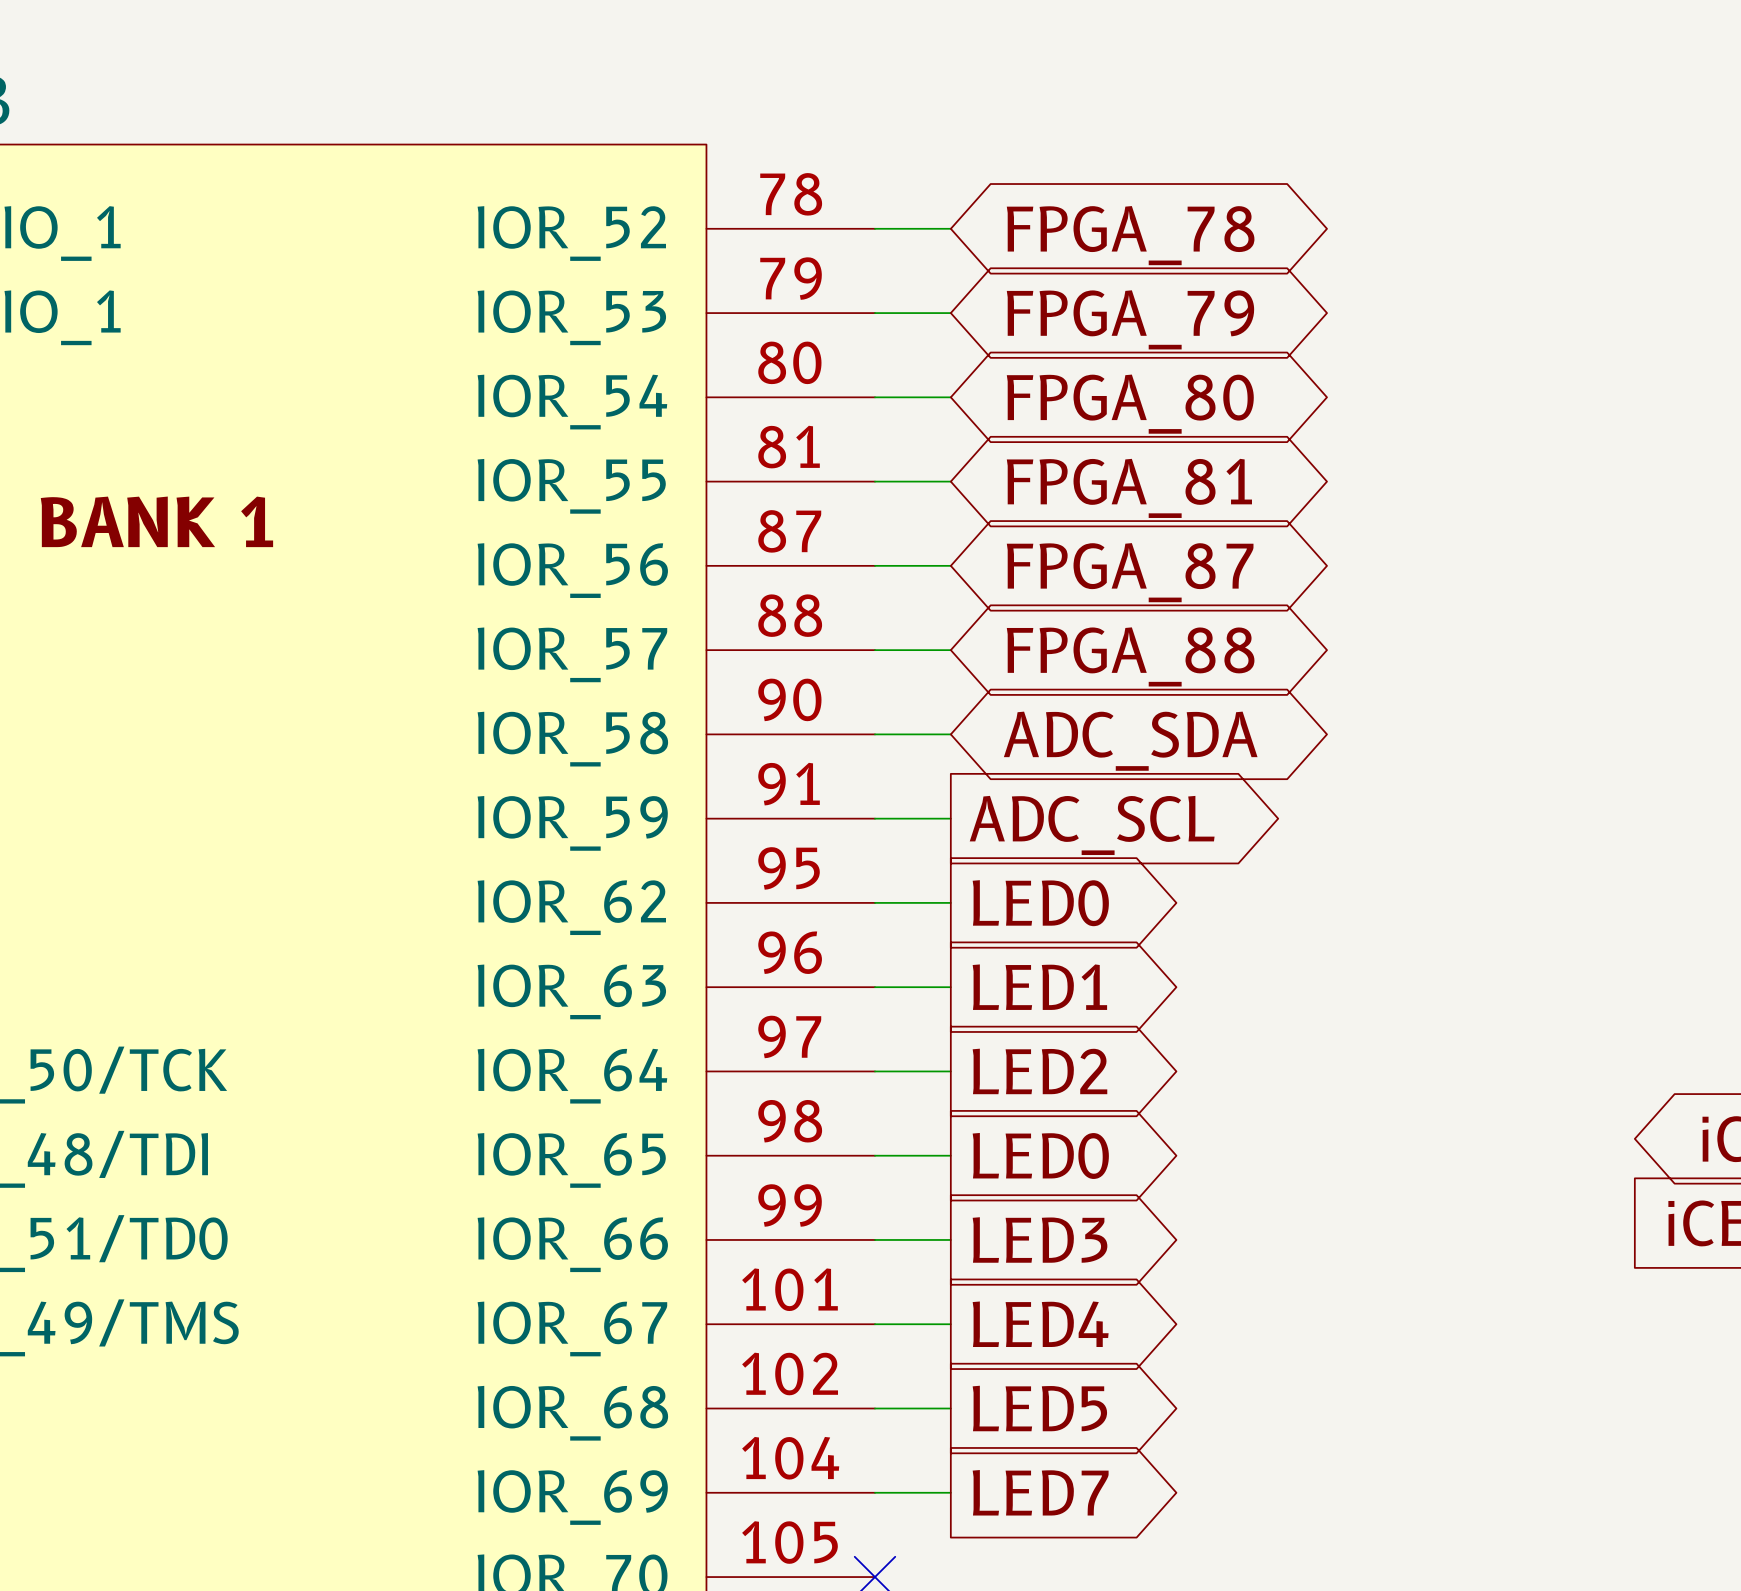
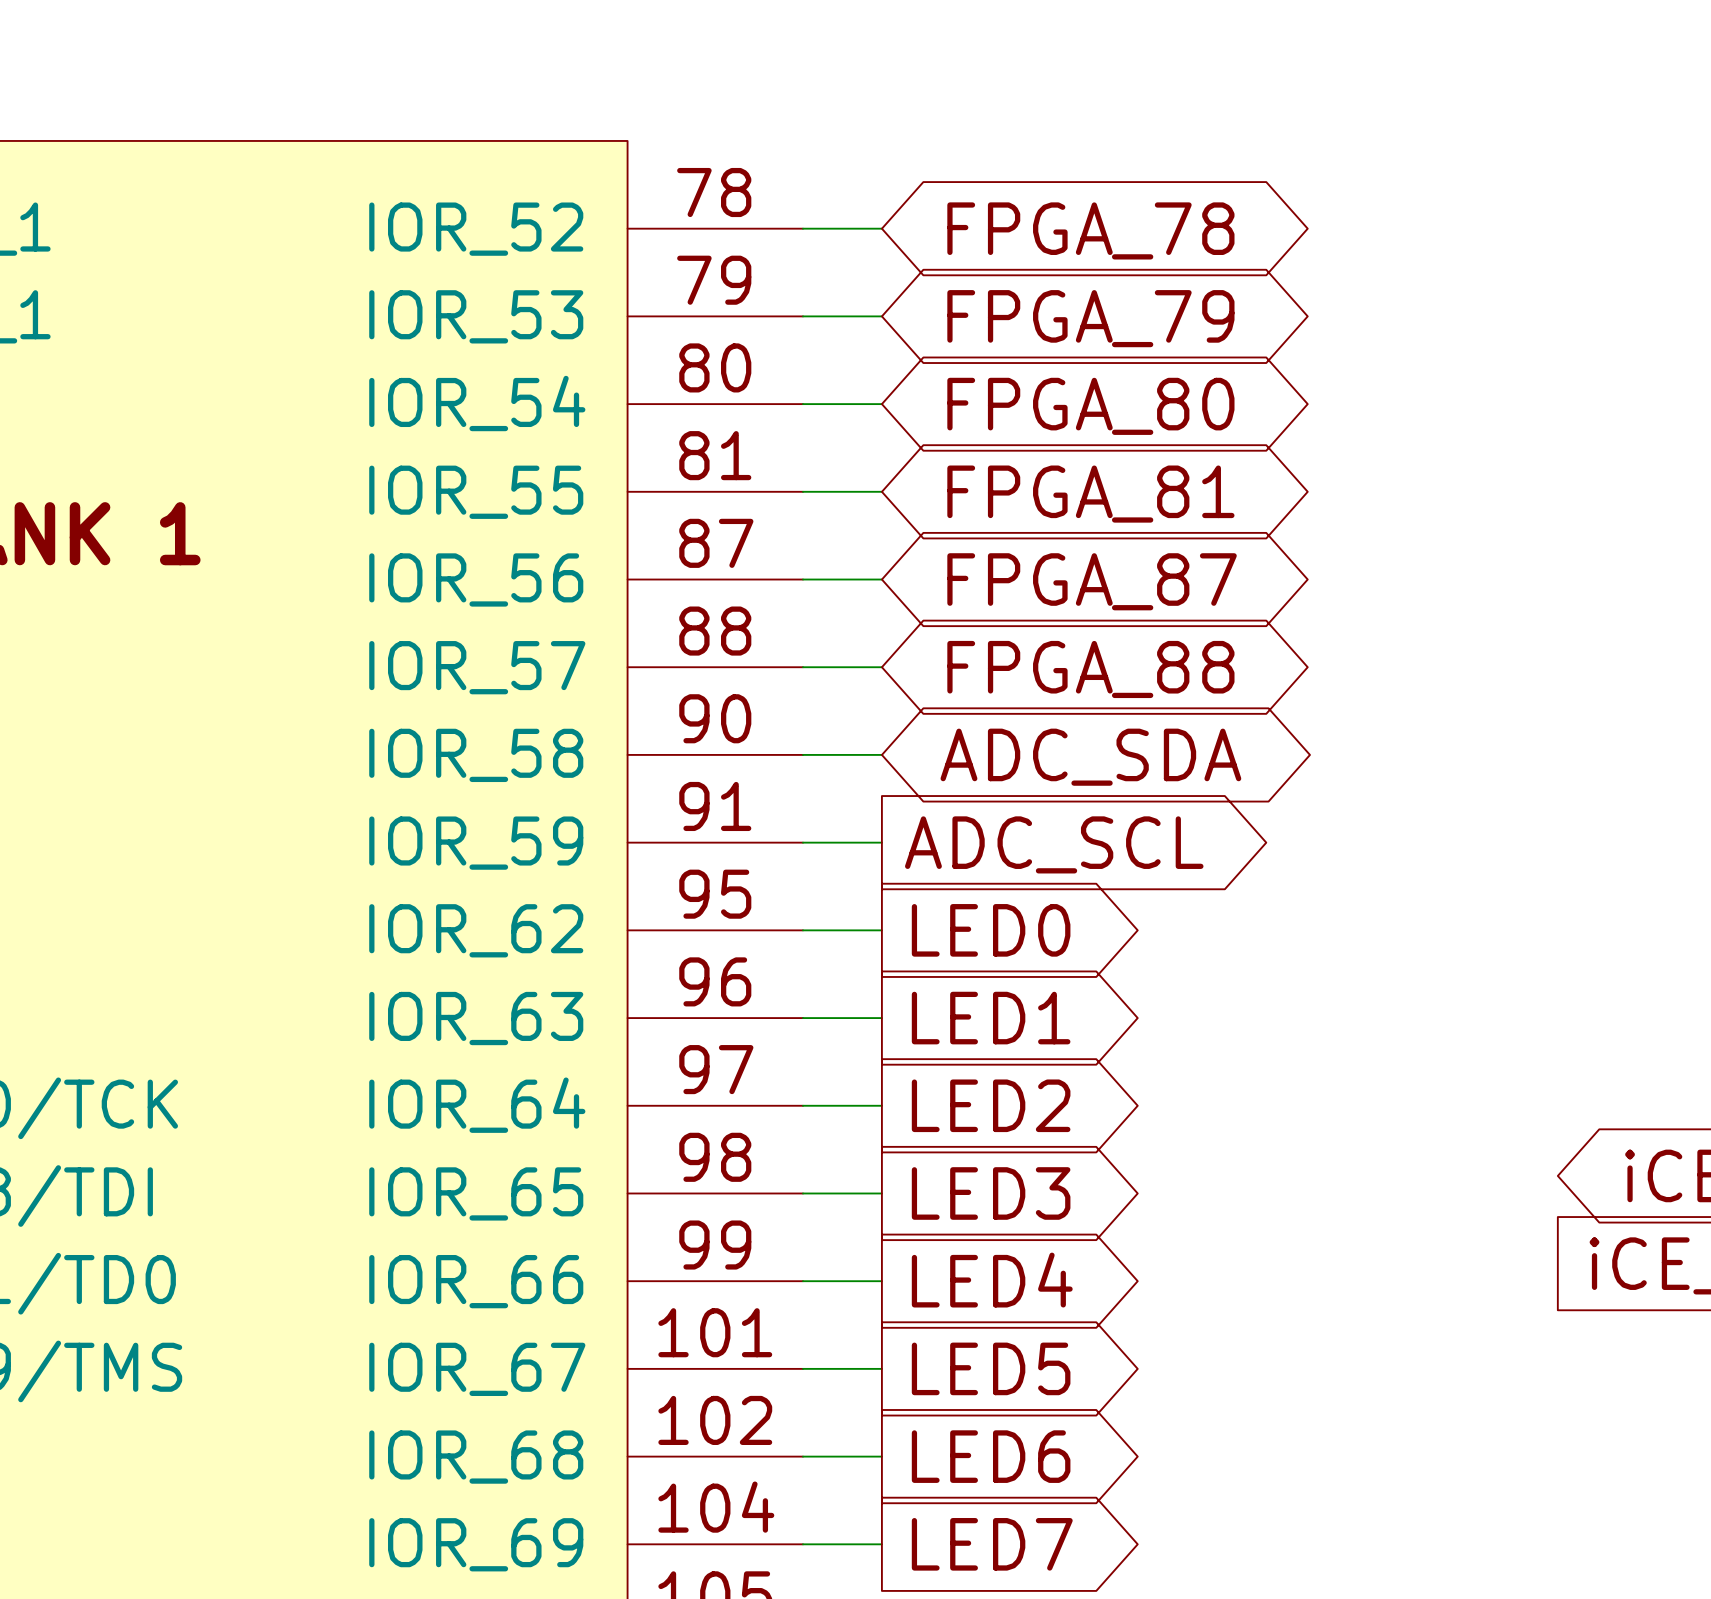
global label: LED0 (1040, 1155) -> LED3 (991, 1193)
global label: LED3 (1040, 1239) -> LED4 (992, 1280)
global label: LED4 (1040, 1324) -> LED5 (991, 1368)
global label: LED5 (1039, 1408) -> LED6 (991, 1456)

